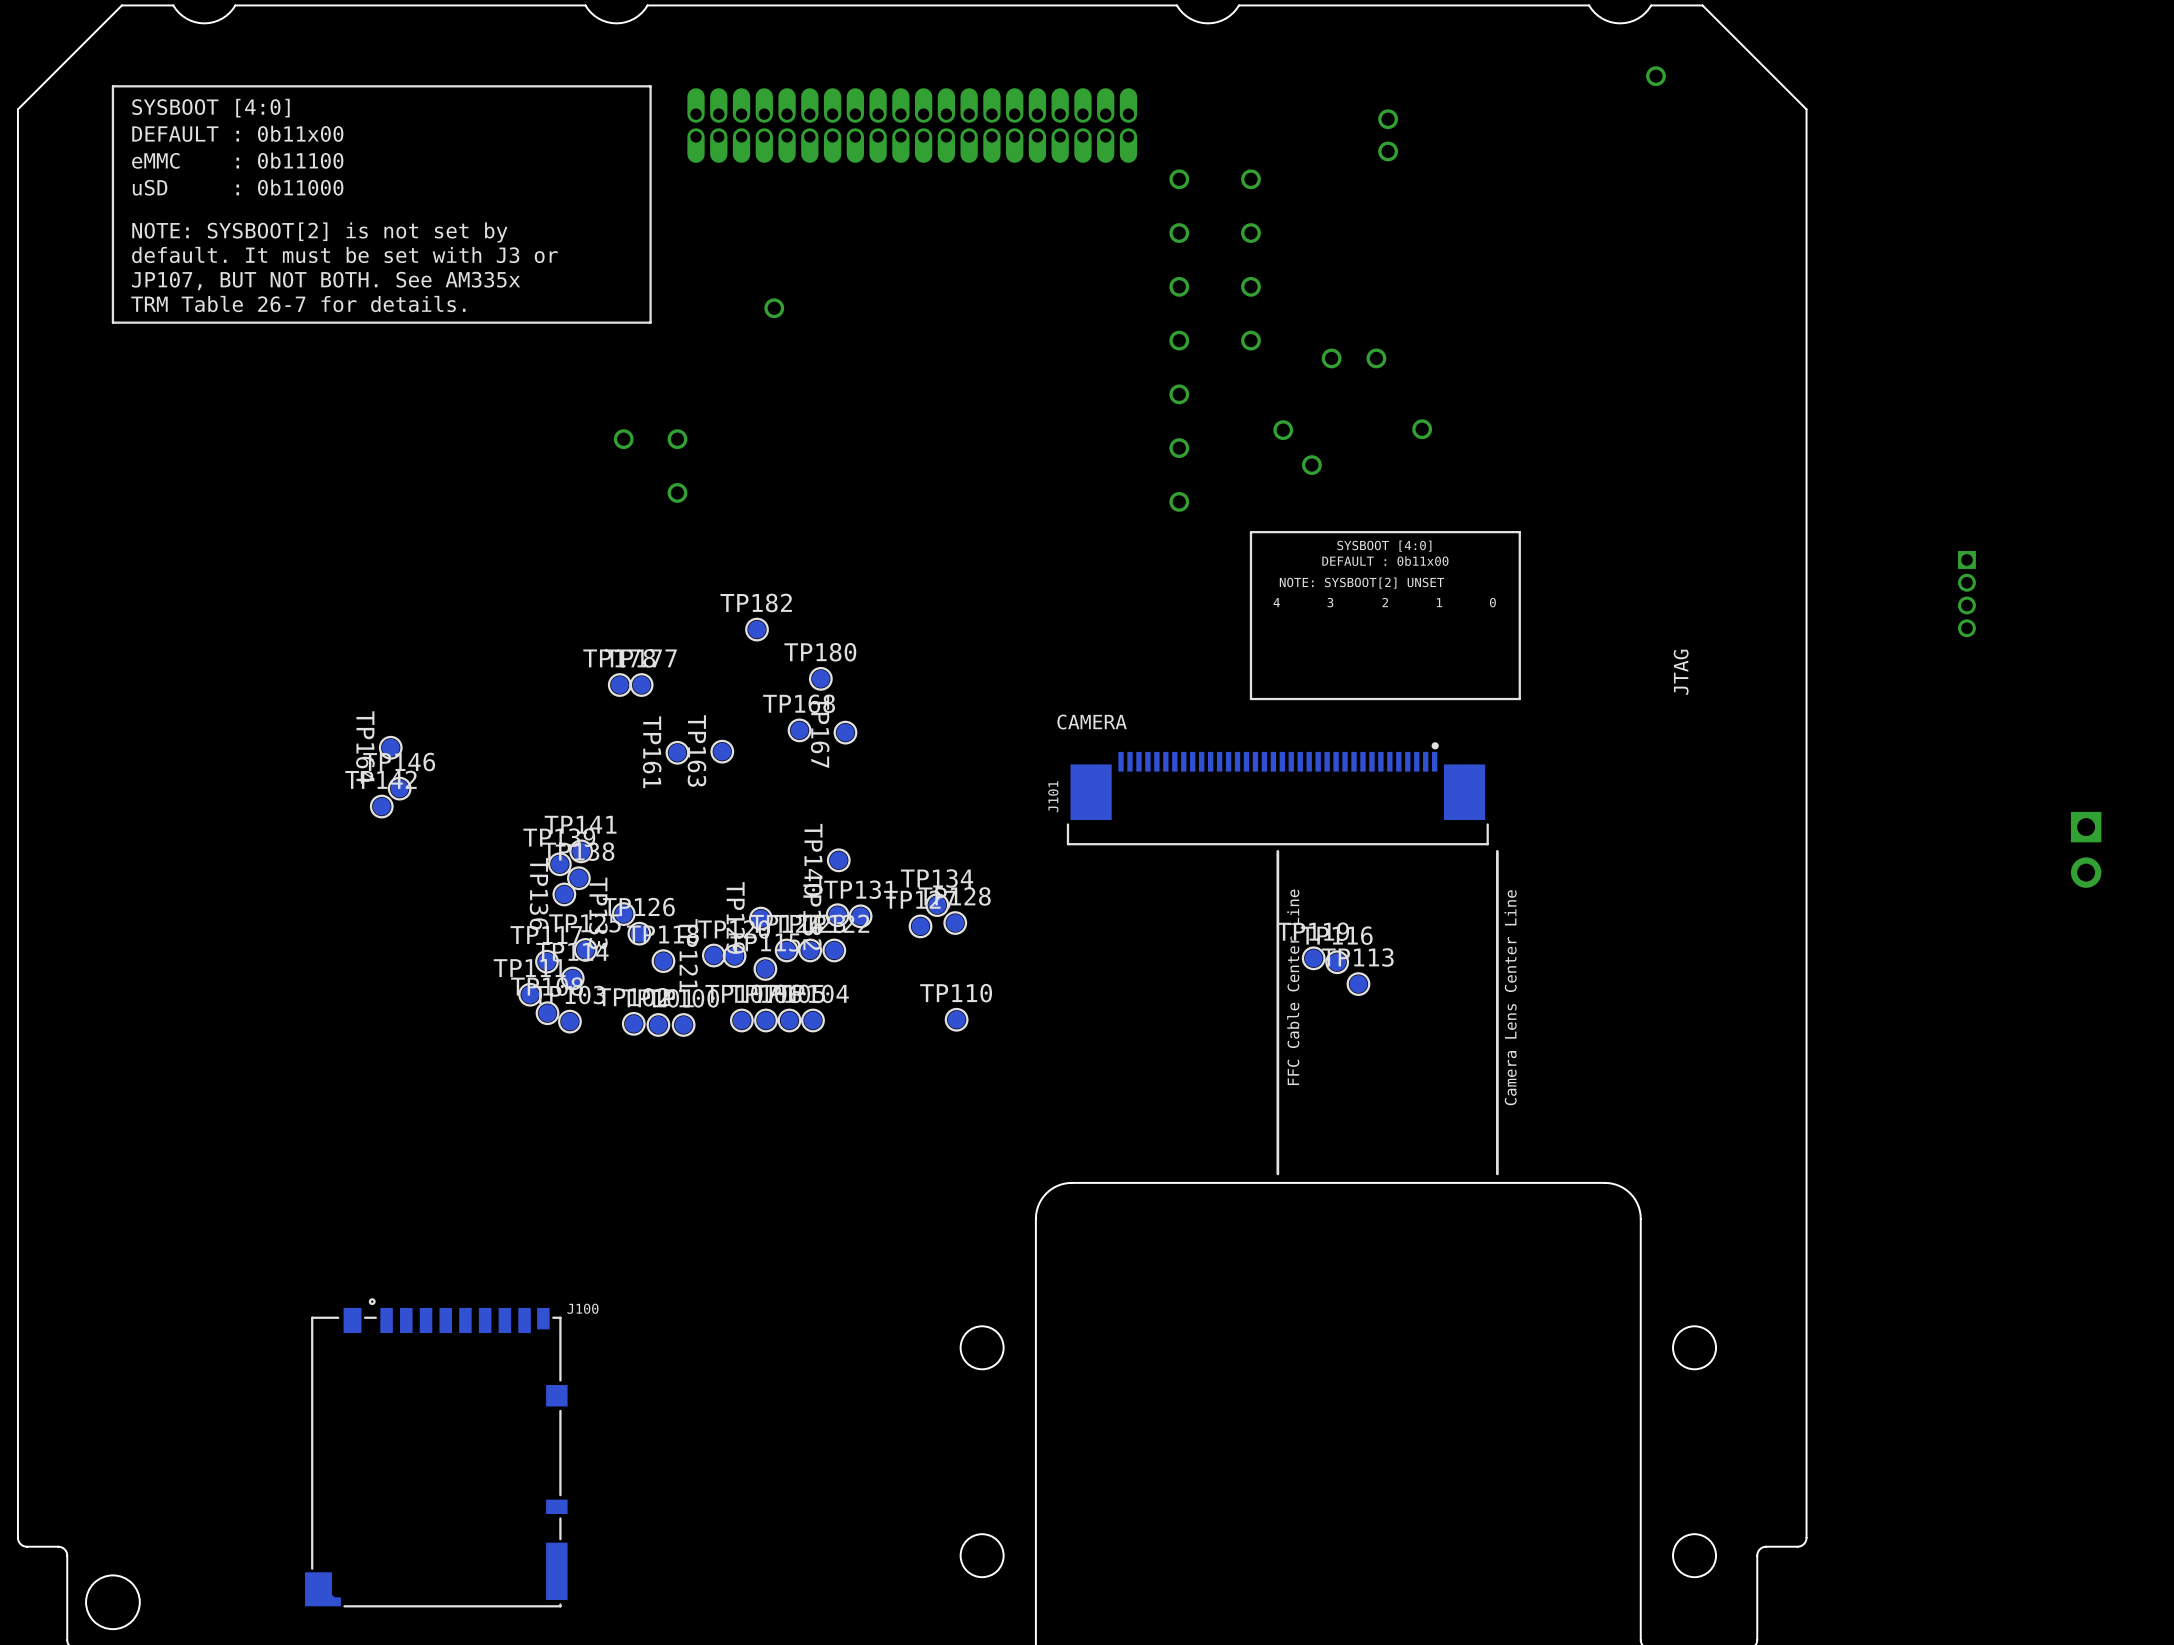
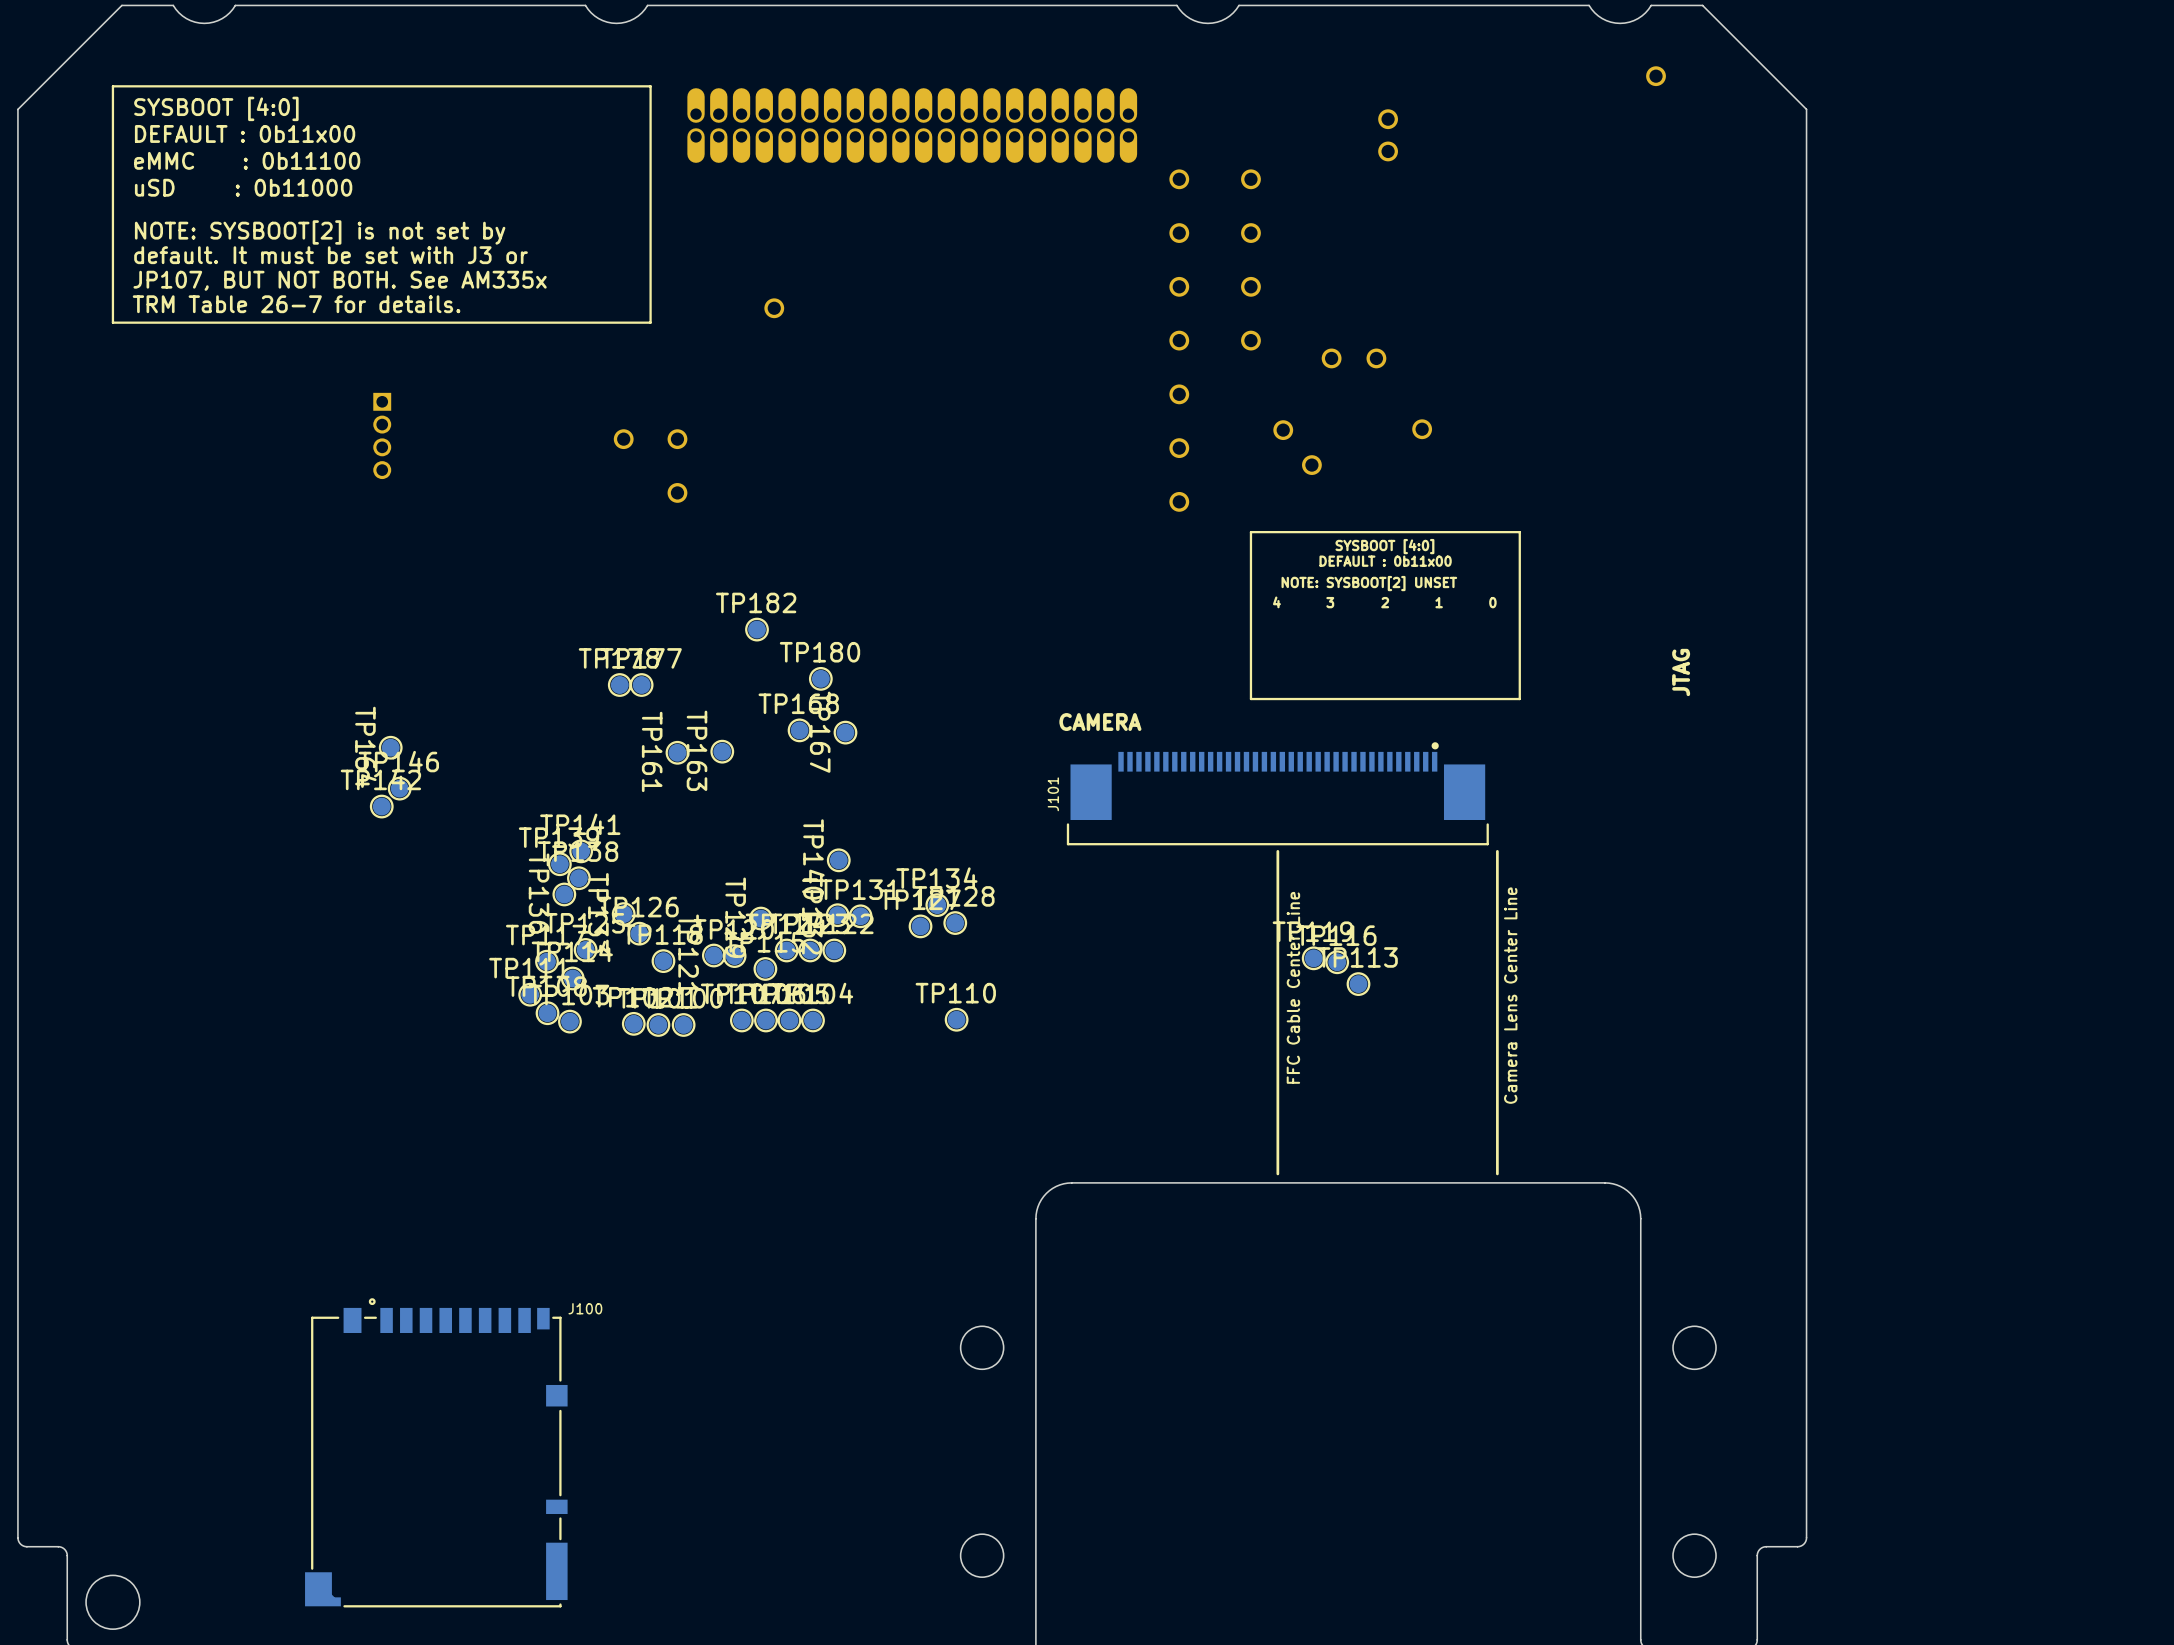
part: none -> (382, 435)
part: (1966, 594) -> none
part: (2086, 849) -> none

